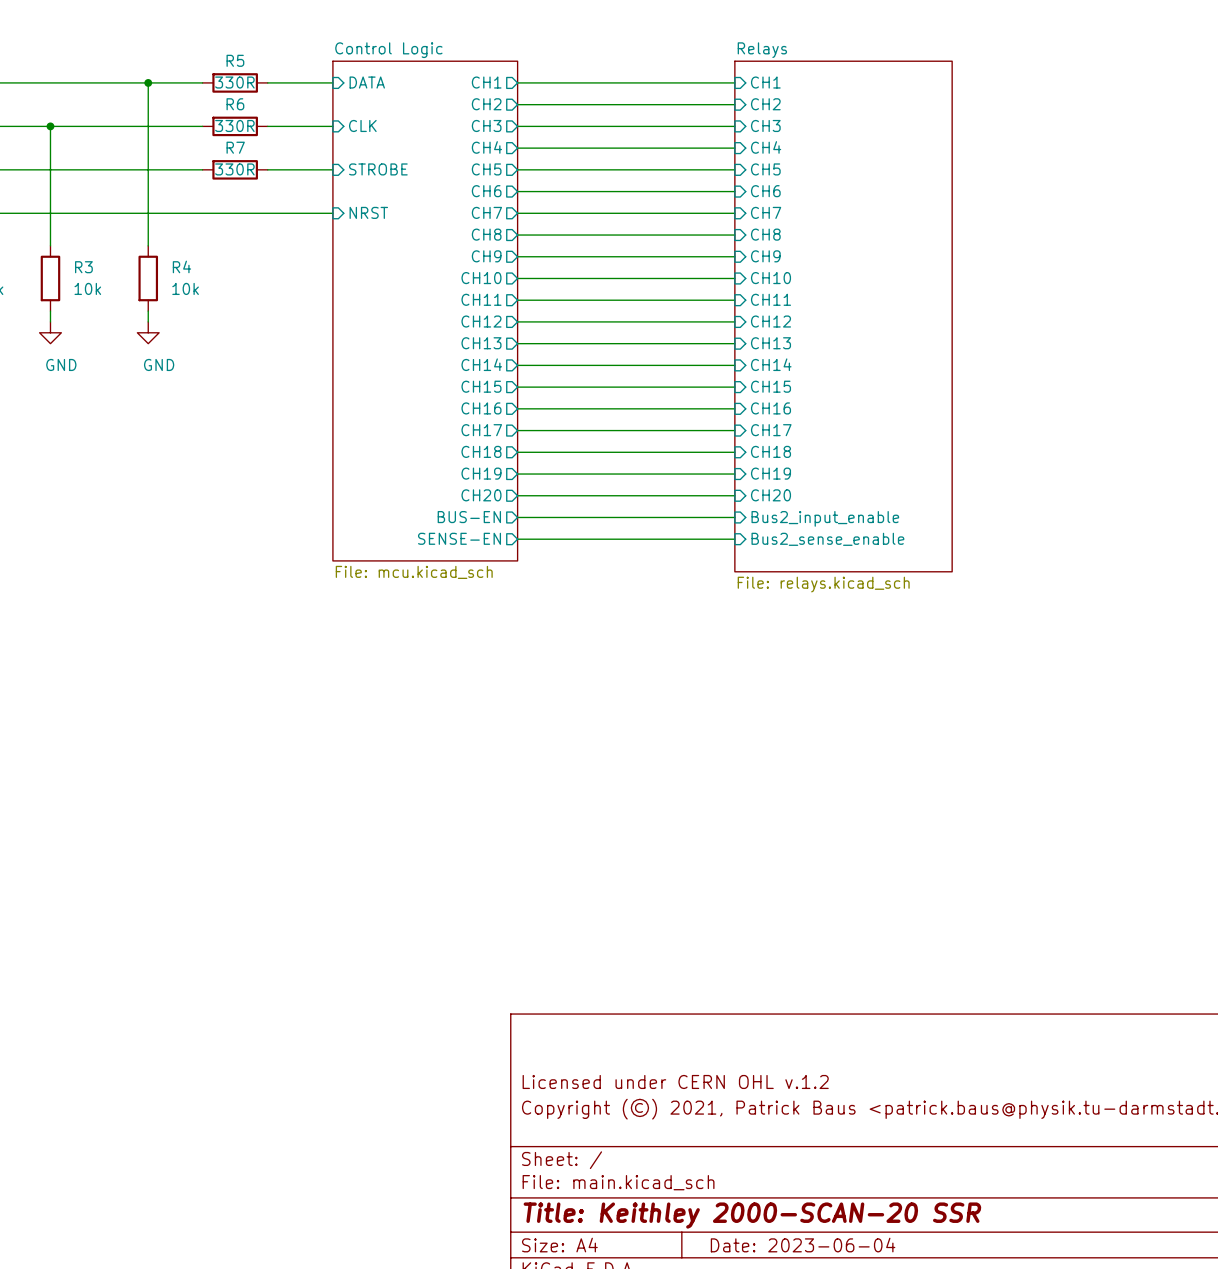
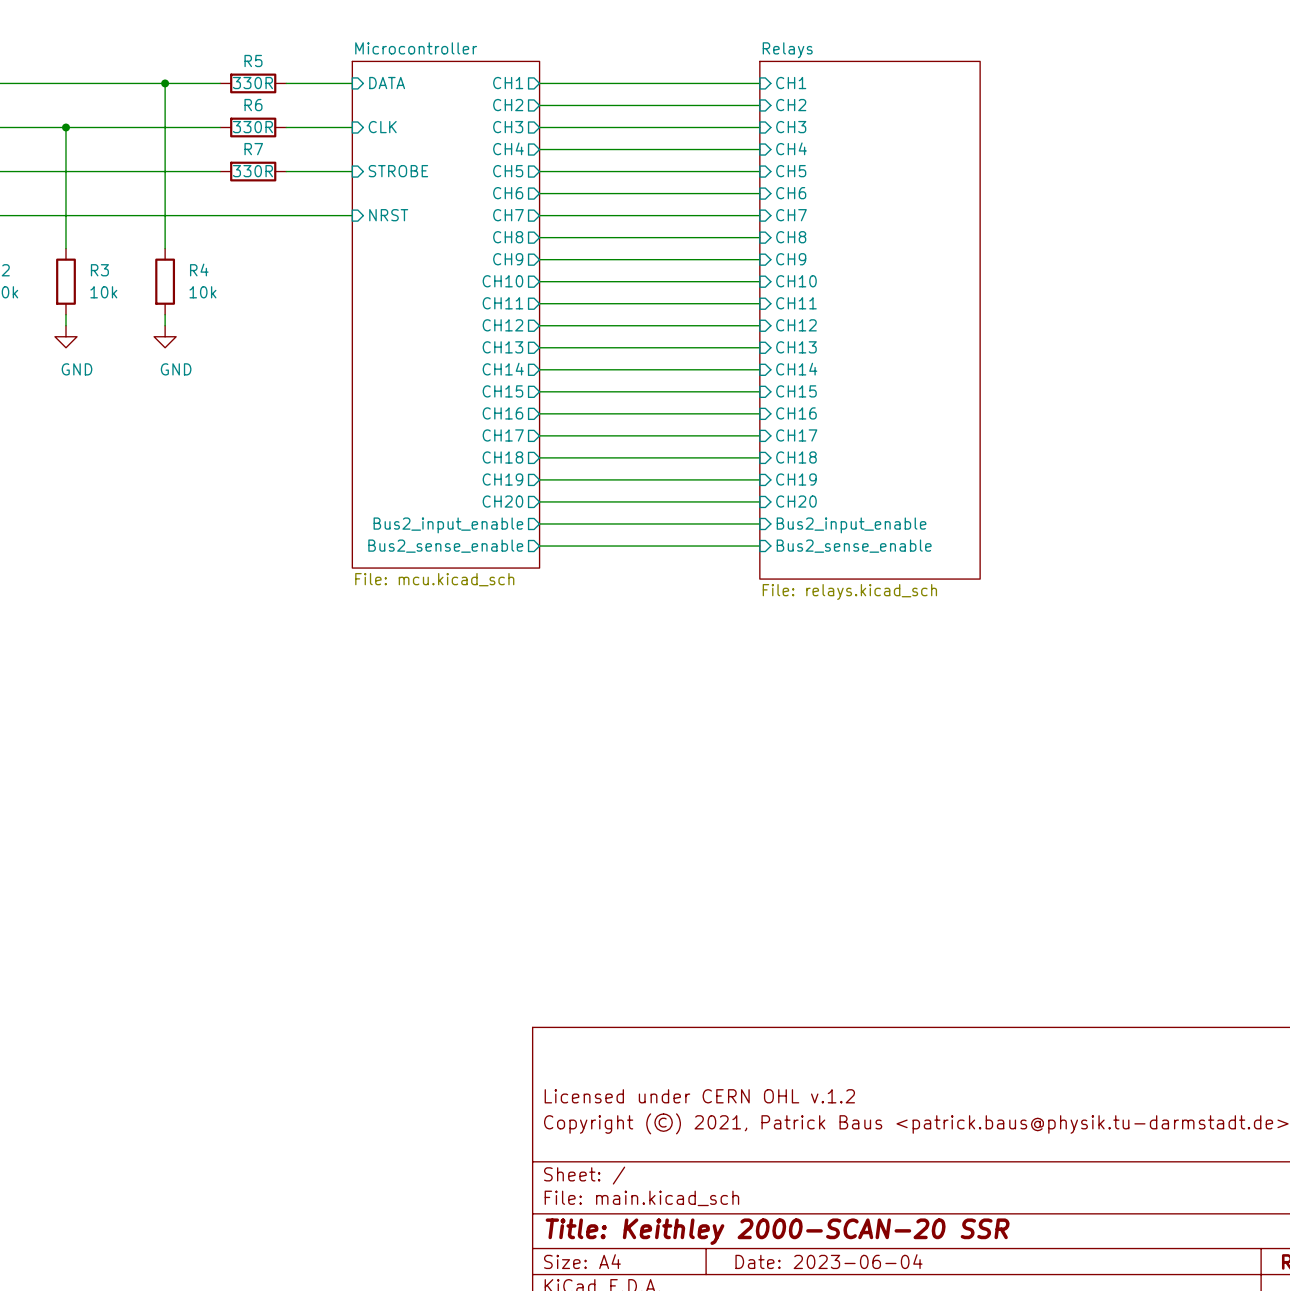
sheet Control Logic name: Control Logic (388, 50) -> Microcontroller (416, 48)
sheet pin: BUS-EN (469, 517) -> Bus2_input_enable (448, 525)
sheet pin: SENSE-EN (459, 538) -> Bus2_sense_enable (445, 546)

